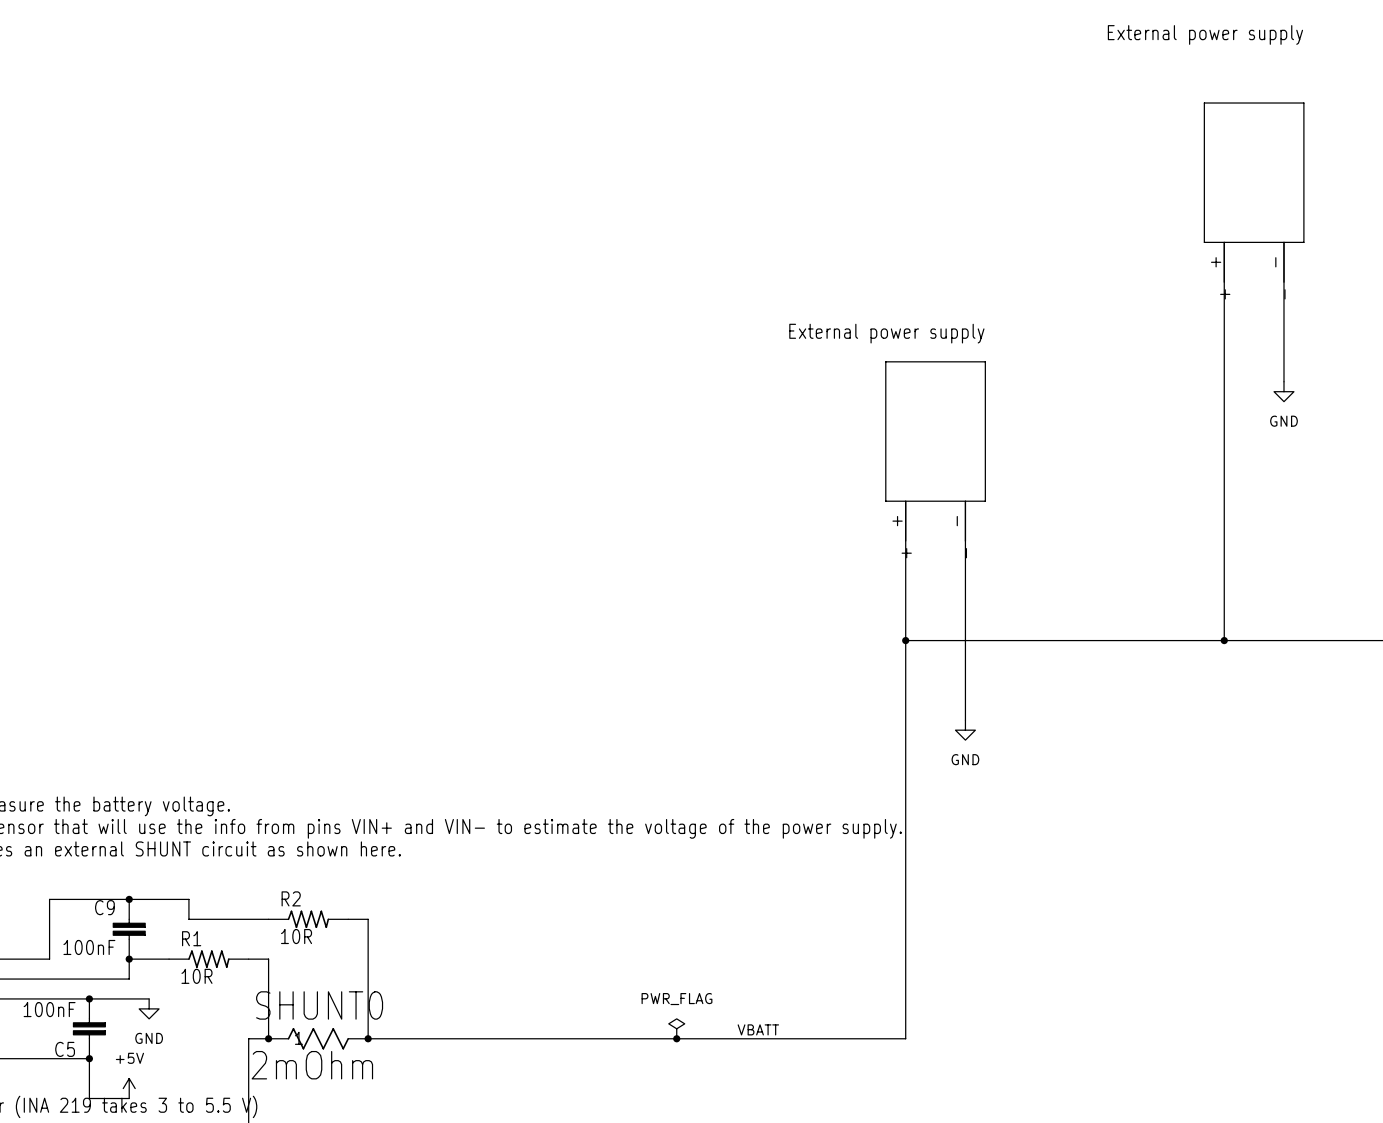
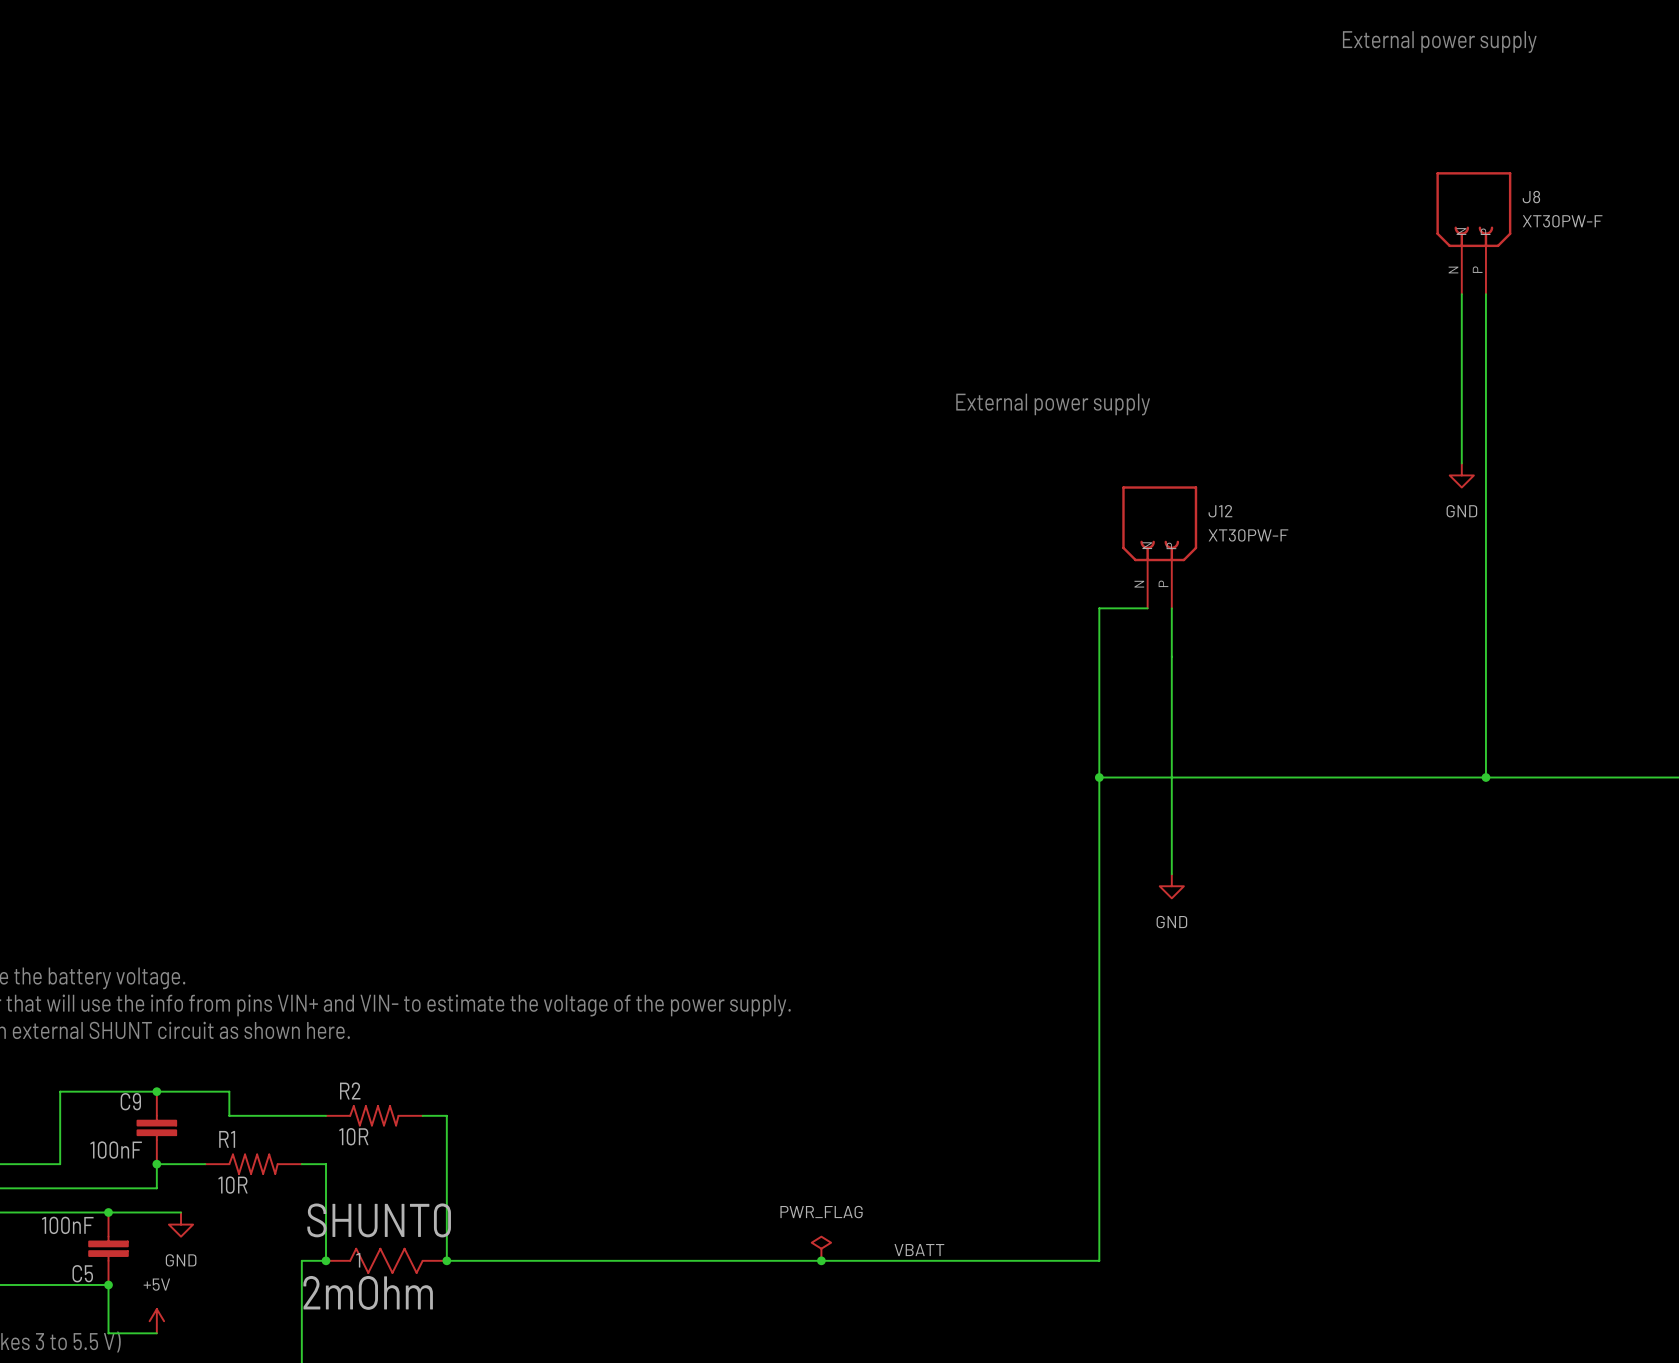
J8: none -> XT30PW-F (1473, 233)
part: (1254, 192) -> none
wire: (1283, 242) (1283, 381) -> (1461, 294) (1461, 463)
power symbol position: GND (1283, 391) -> GND (1461, 475)
J12: none -> XT30PW-F (1159, 547)
part: (935, 451) -> none

